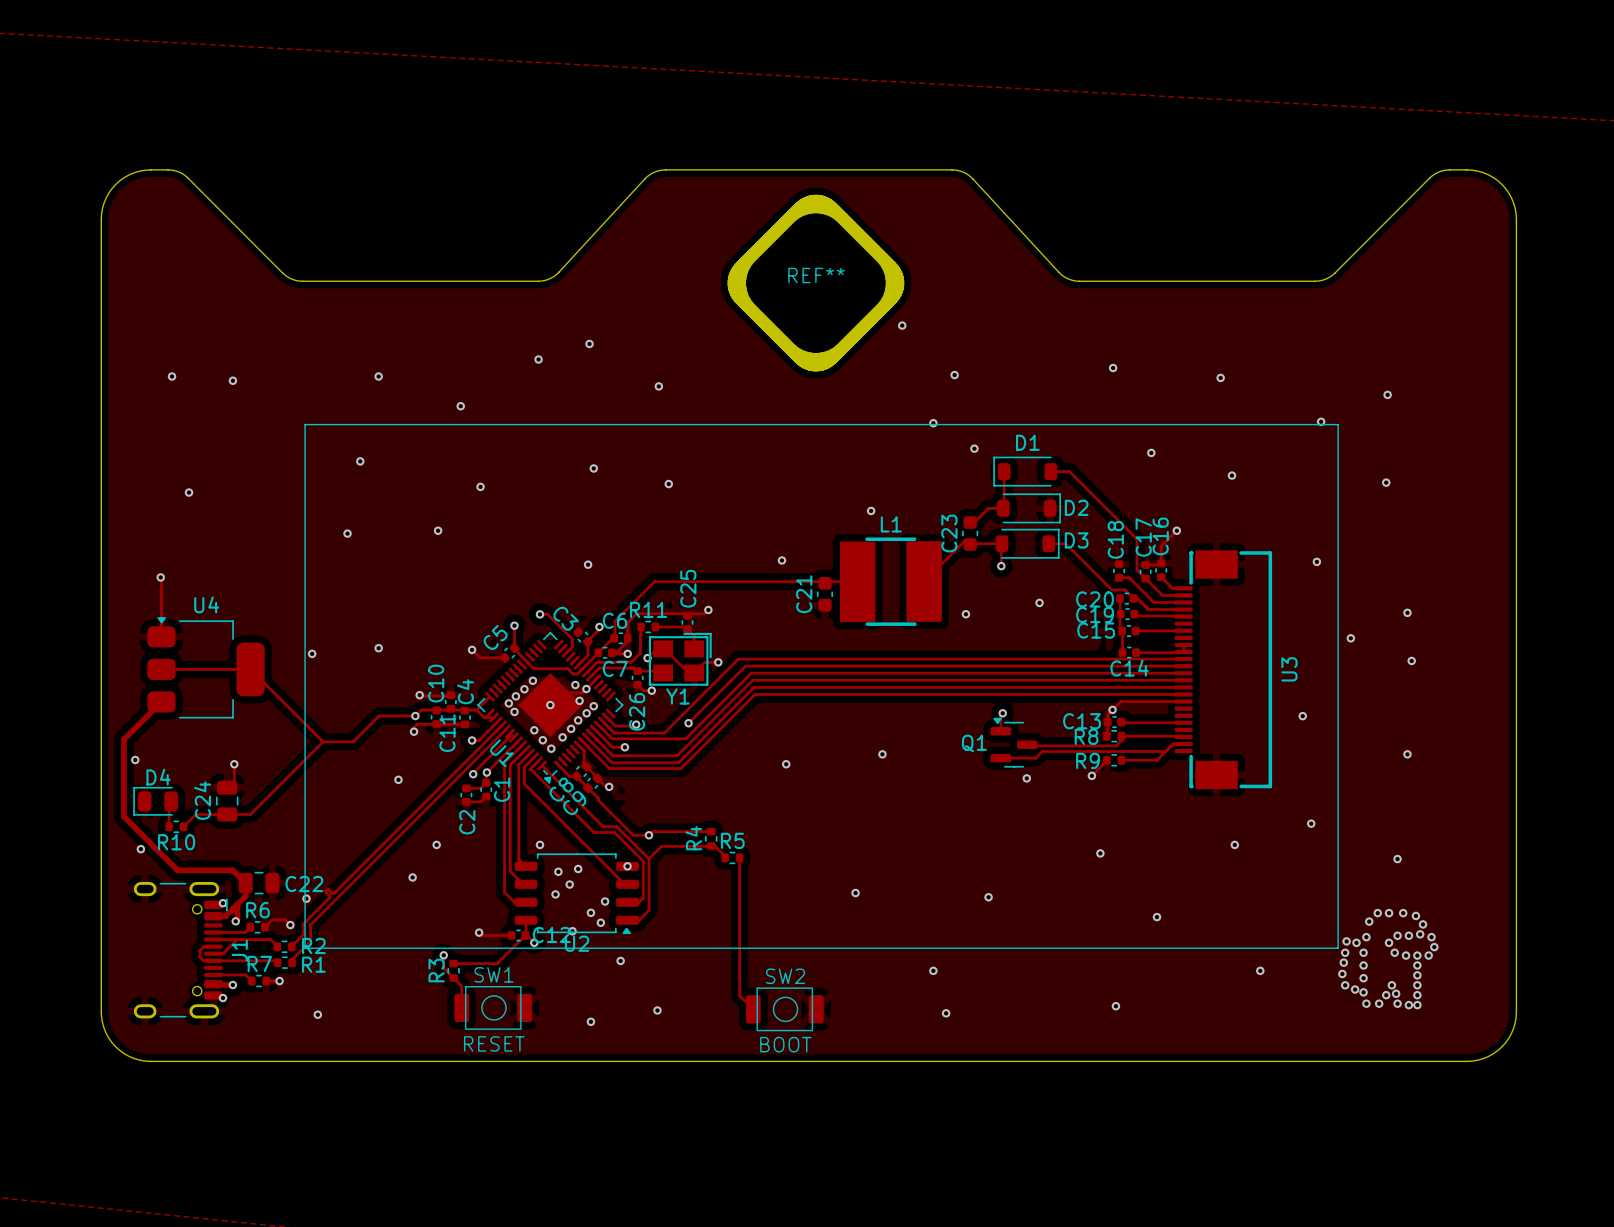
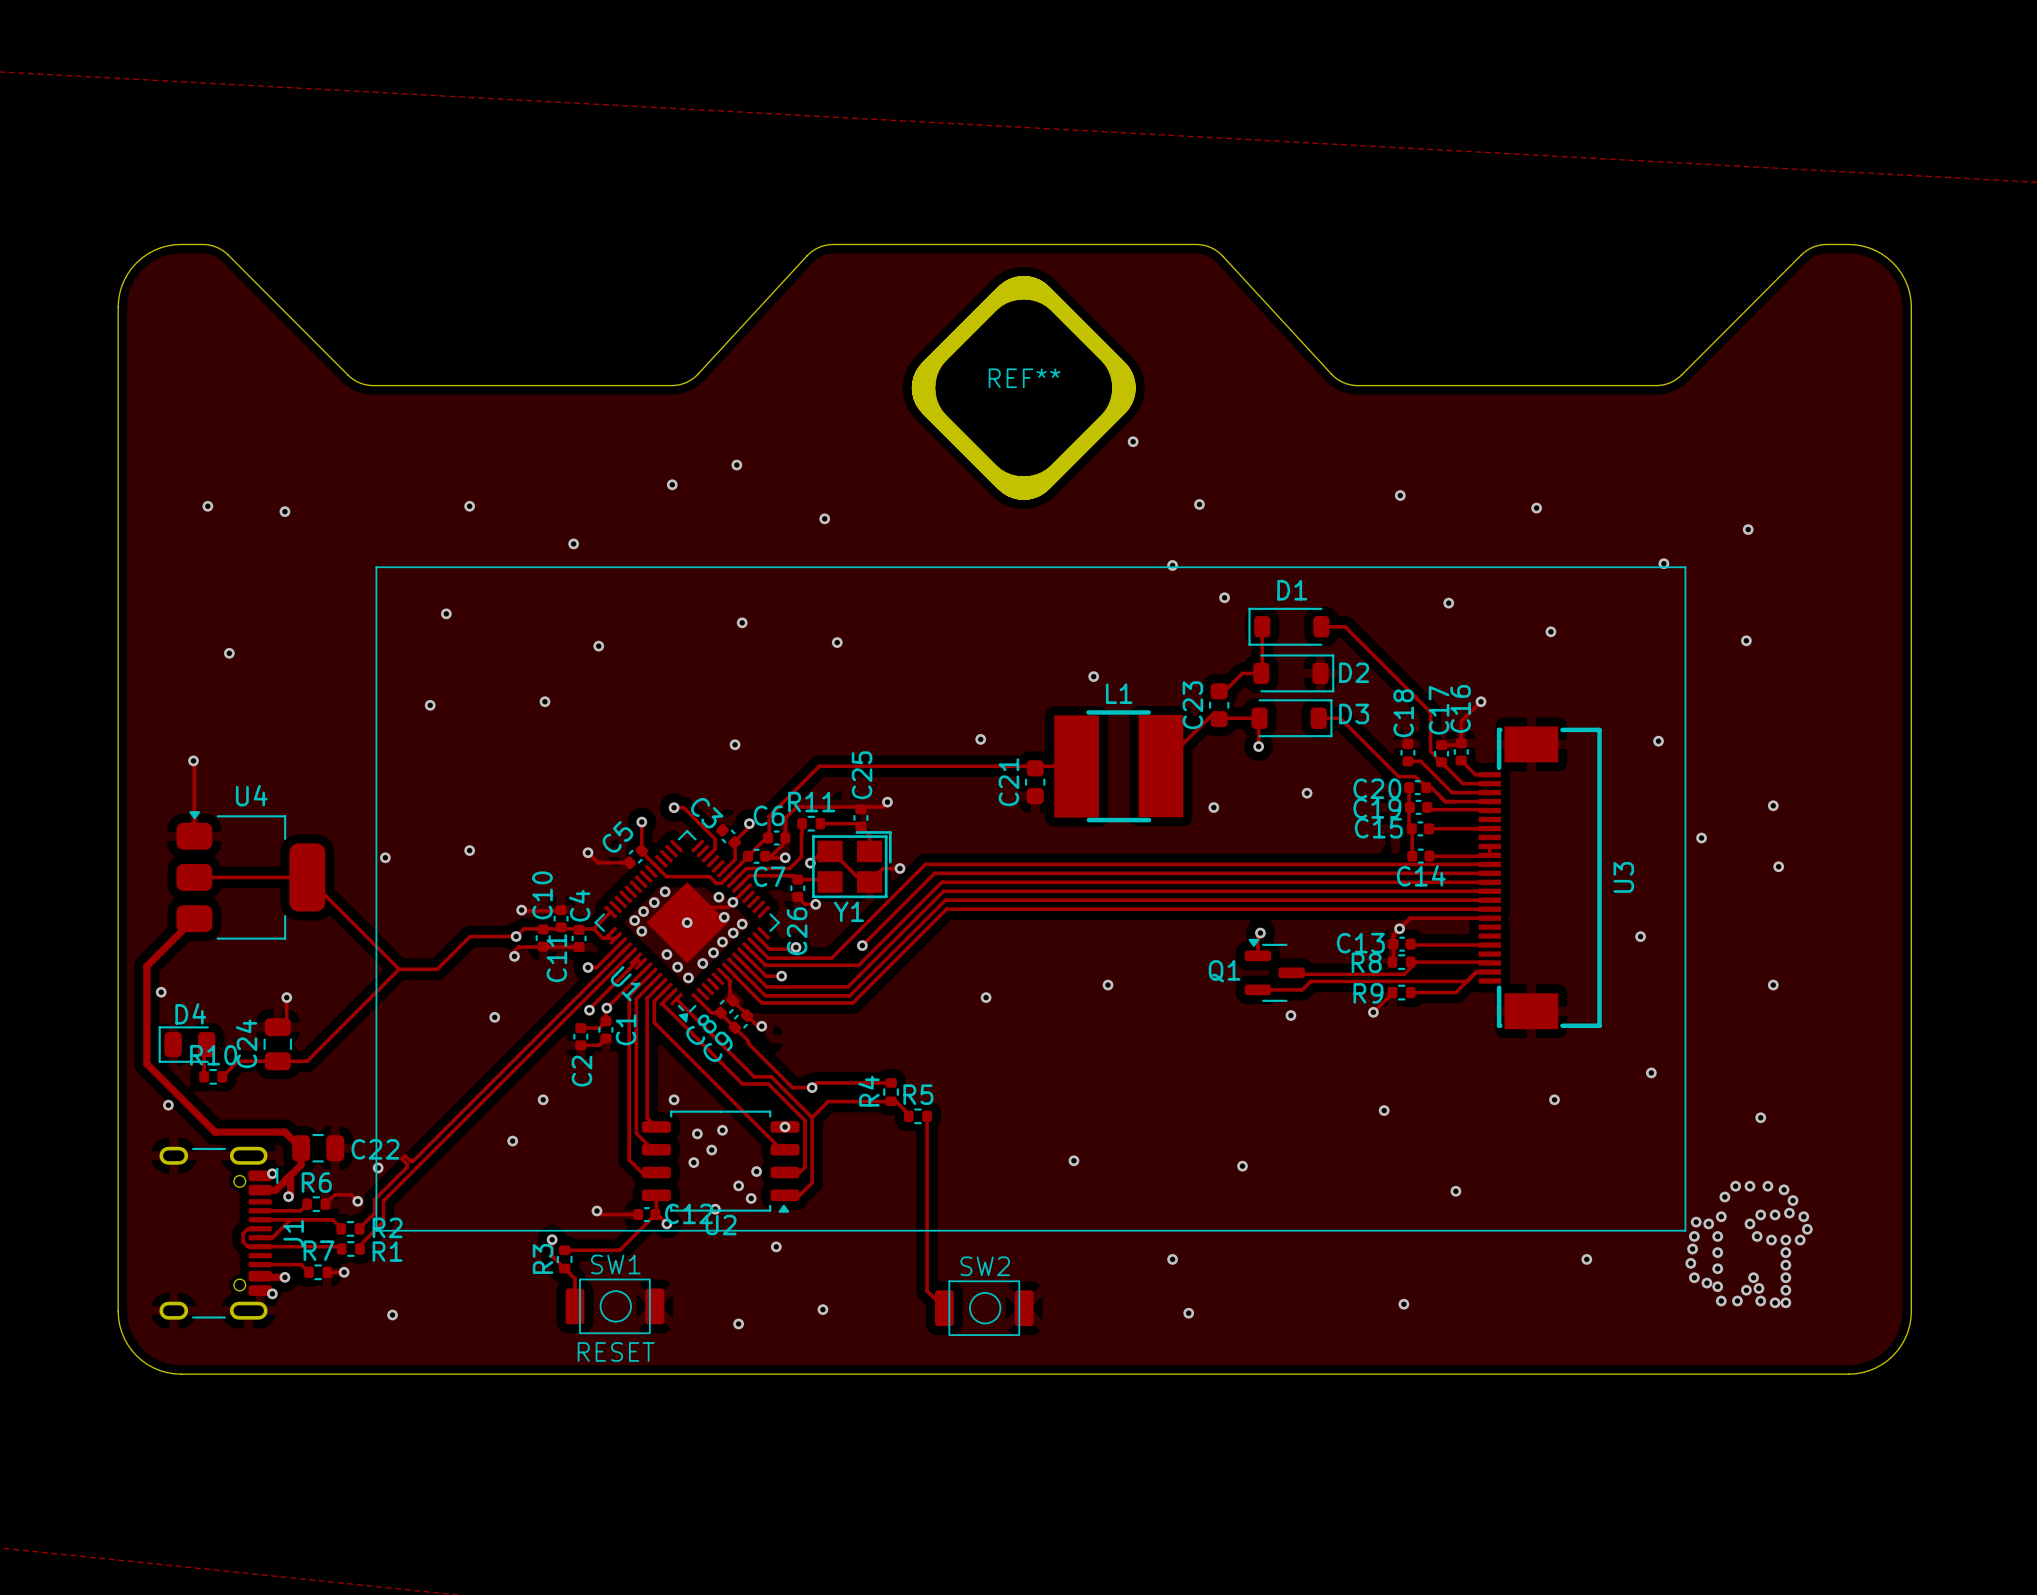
R10 name position: R10 (176, 842) -> R10 (213, 1055)
text: BOOT (785, 1044) -> none

